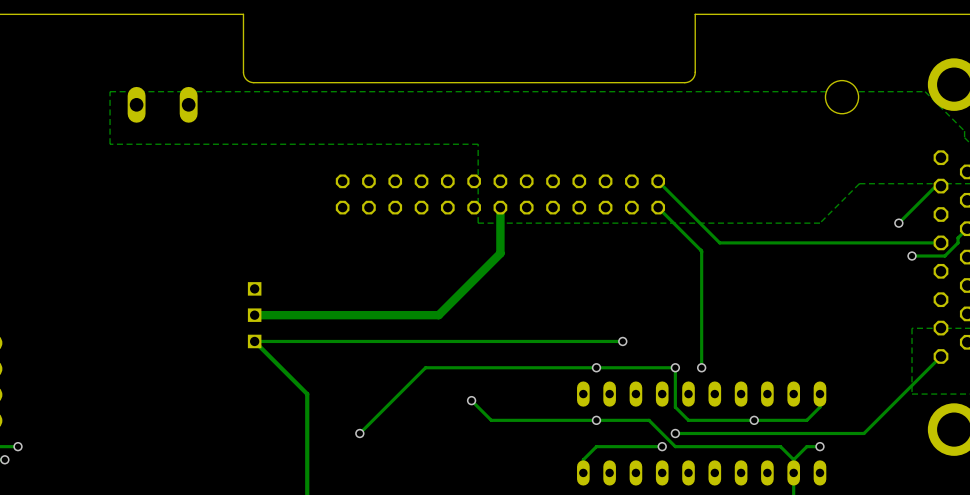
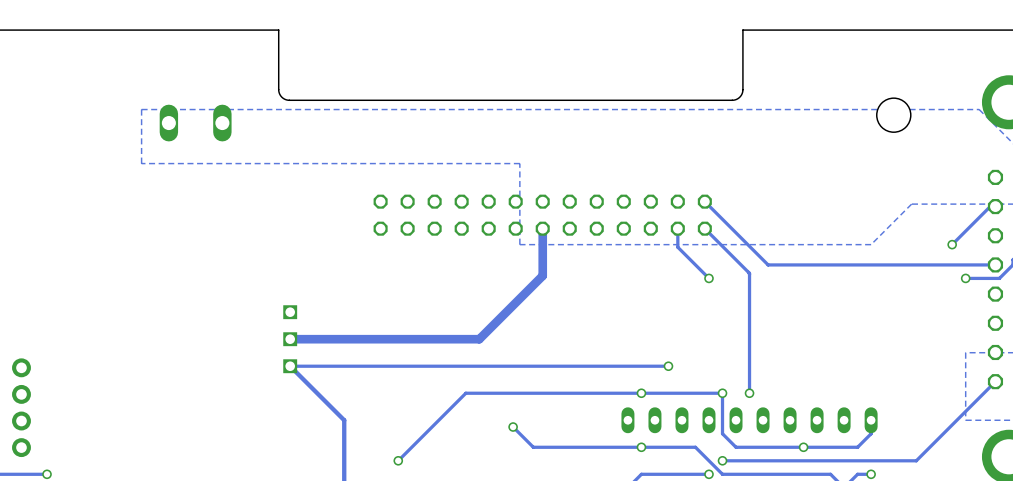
track: none -> (677, 228) (677, 247) (709, 278)
via: none -> (709, 278)

